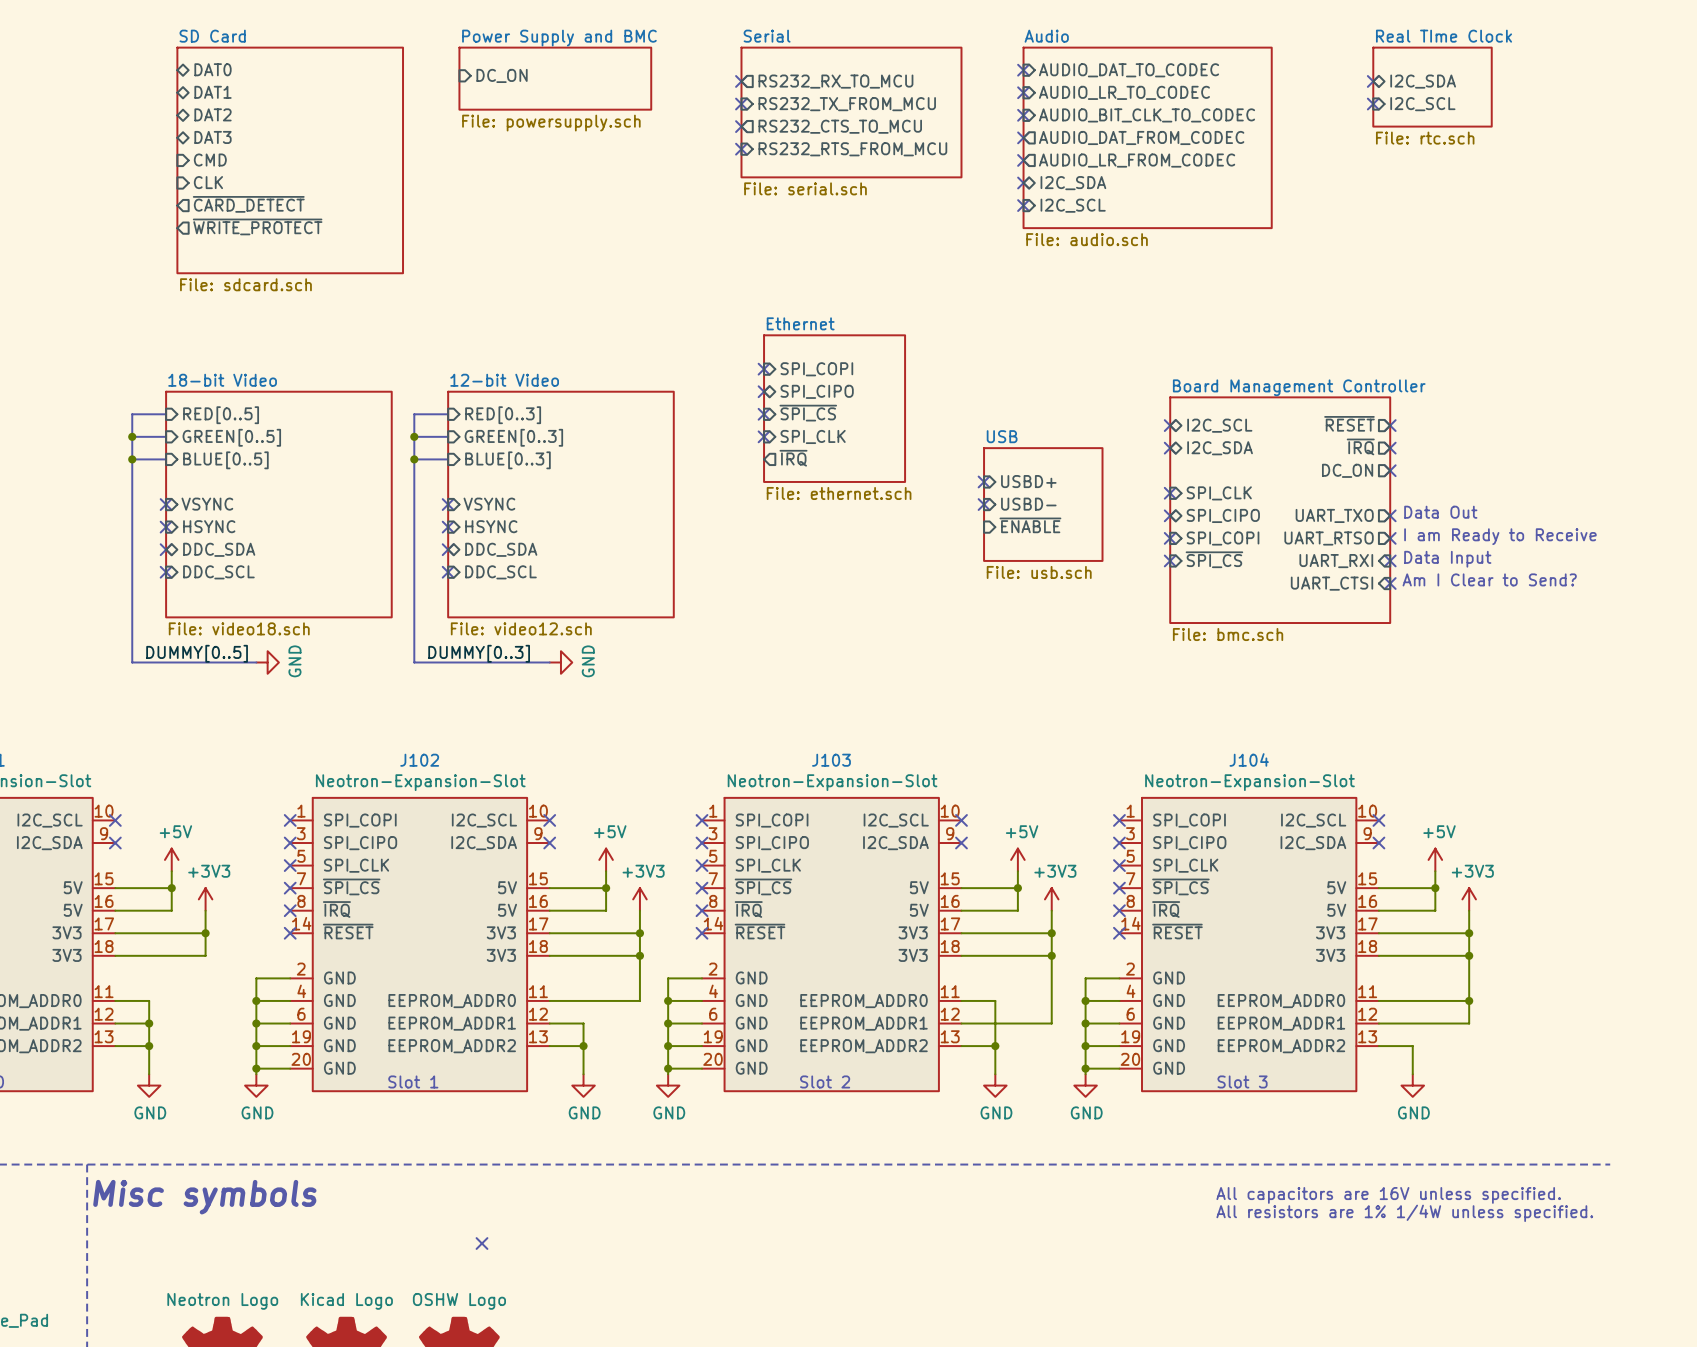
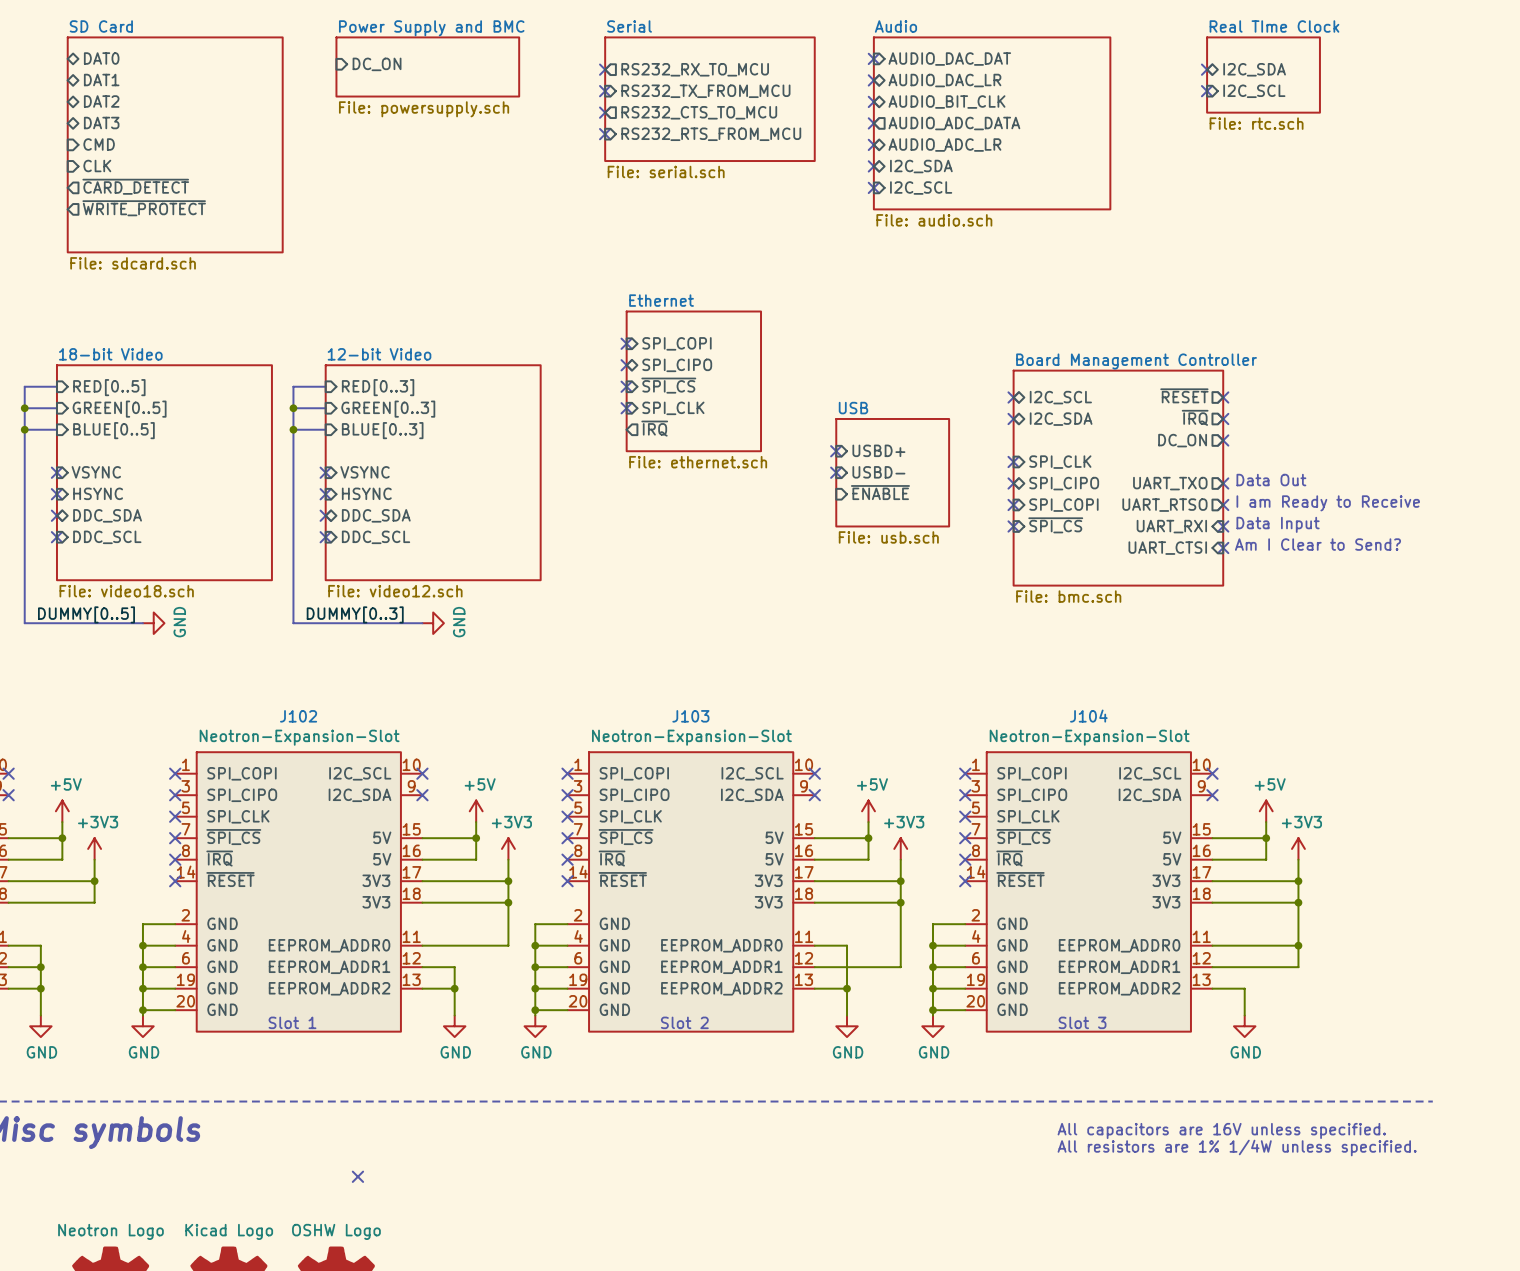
sheet pin: AUDIO_DAT_TO_CODEC (1129, 70) -> AUDIO_DAC_DAT (949, 59)
sheet pin shape: input (1124, 92) -> bidirectional (944, 80)
sheet pin: AUDIO_LR_TO_CODEC (1124, 92) -> AUDIO_DAC_LR (944, 80)
sheet pin shape: input (1147, 115) -> bidirectional (946, 102)
sheet pin: AUDIO_BIT_CLK_TO_CODEC (1147, 115) -> AUDIO_BIT_CLK (946, 102)
sheet pin: AUDIO_DAT_FROM_CODEC (1141, 137) -> AUDIO_ADC_DATA (954, 123)
sheet pin shape: output (1137, 160) -> bidirectional (944, 145)
sheet pin: AUDIO_LR_FROM_CODEC (1137, 160) -> AUDIO_ADC_LR (944, 145)

